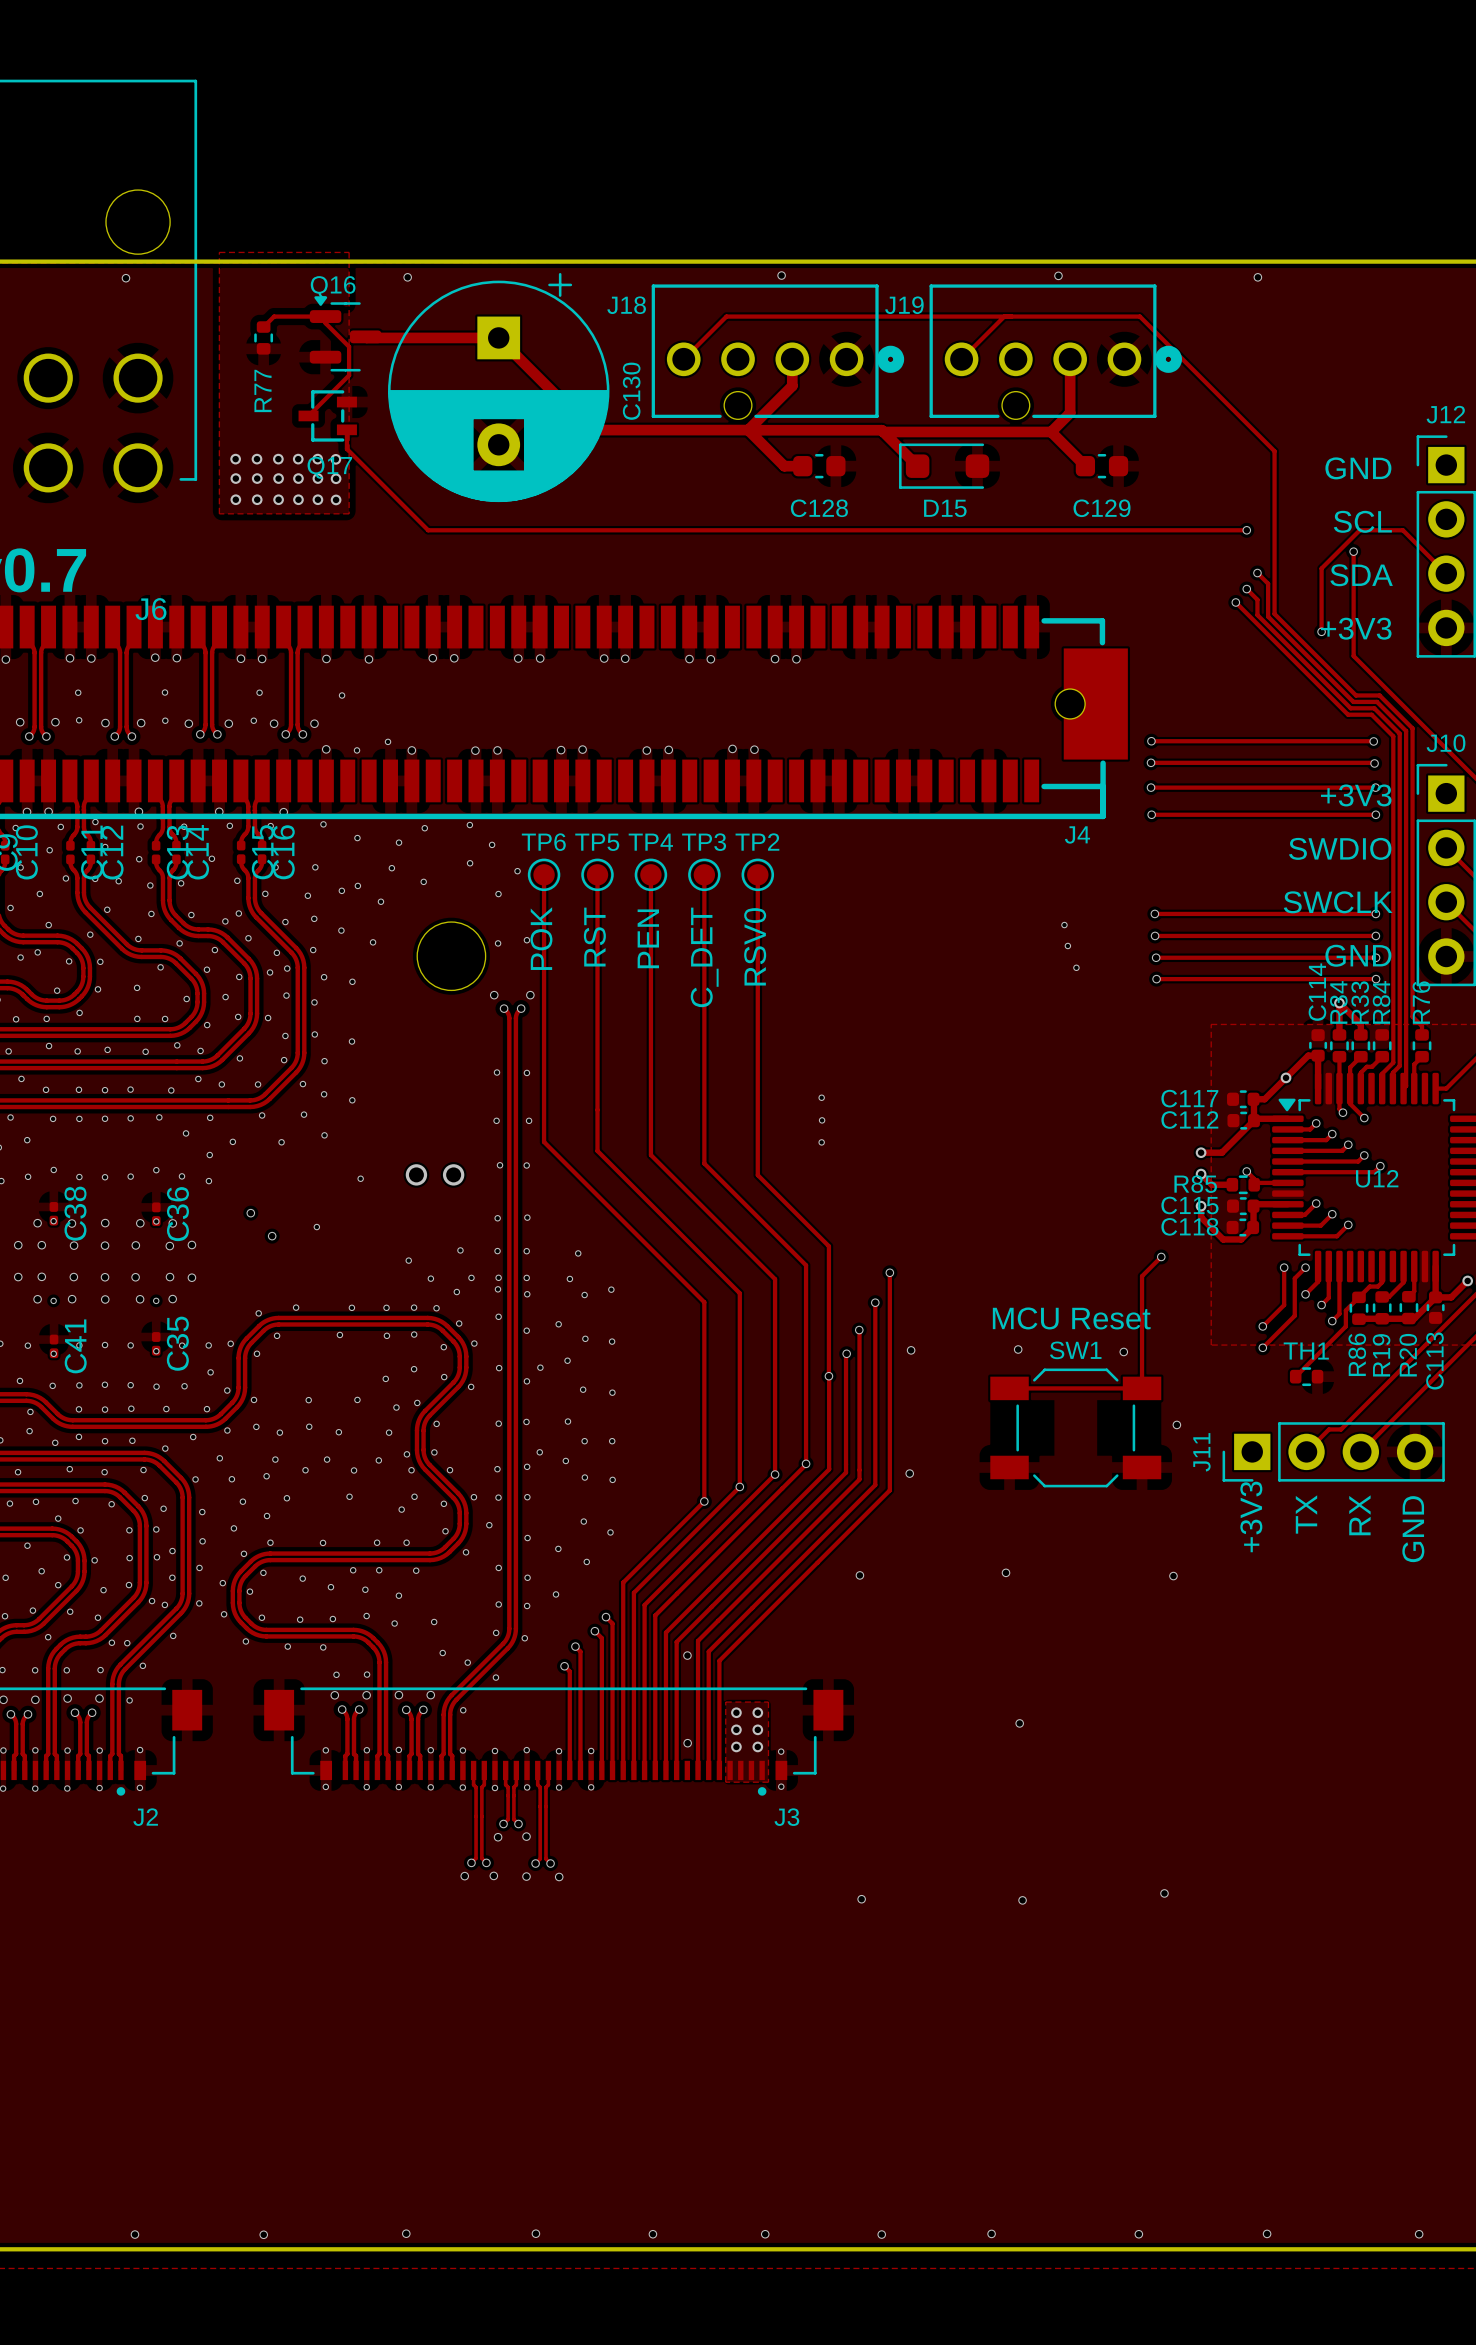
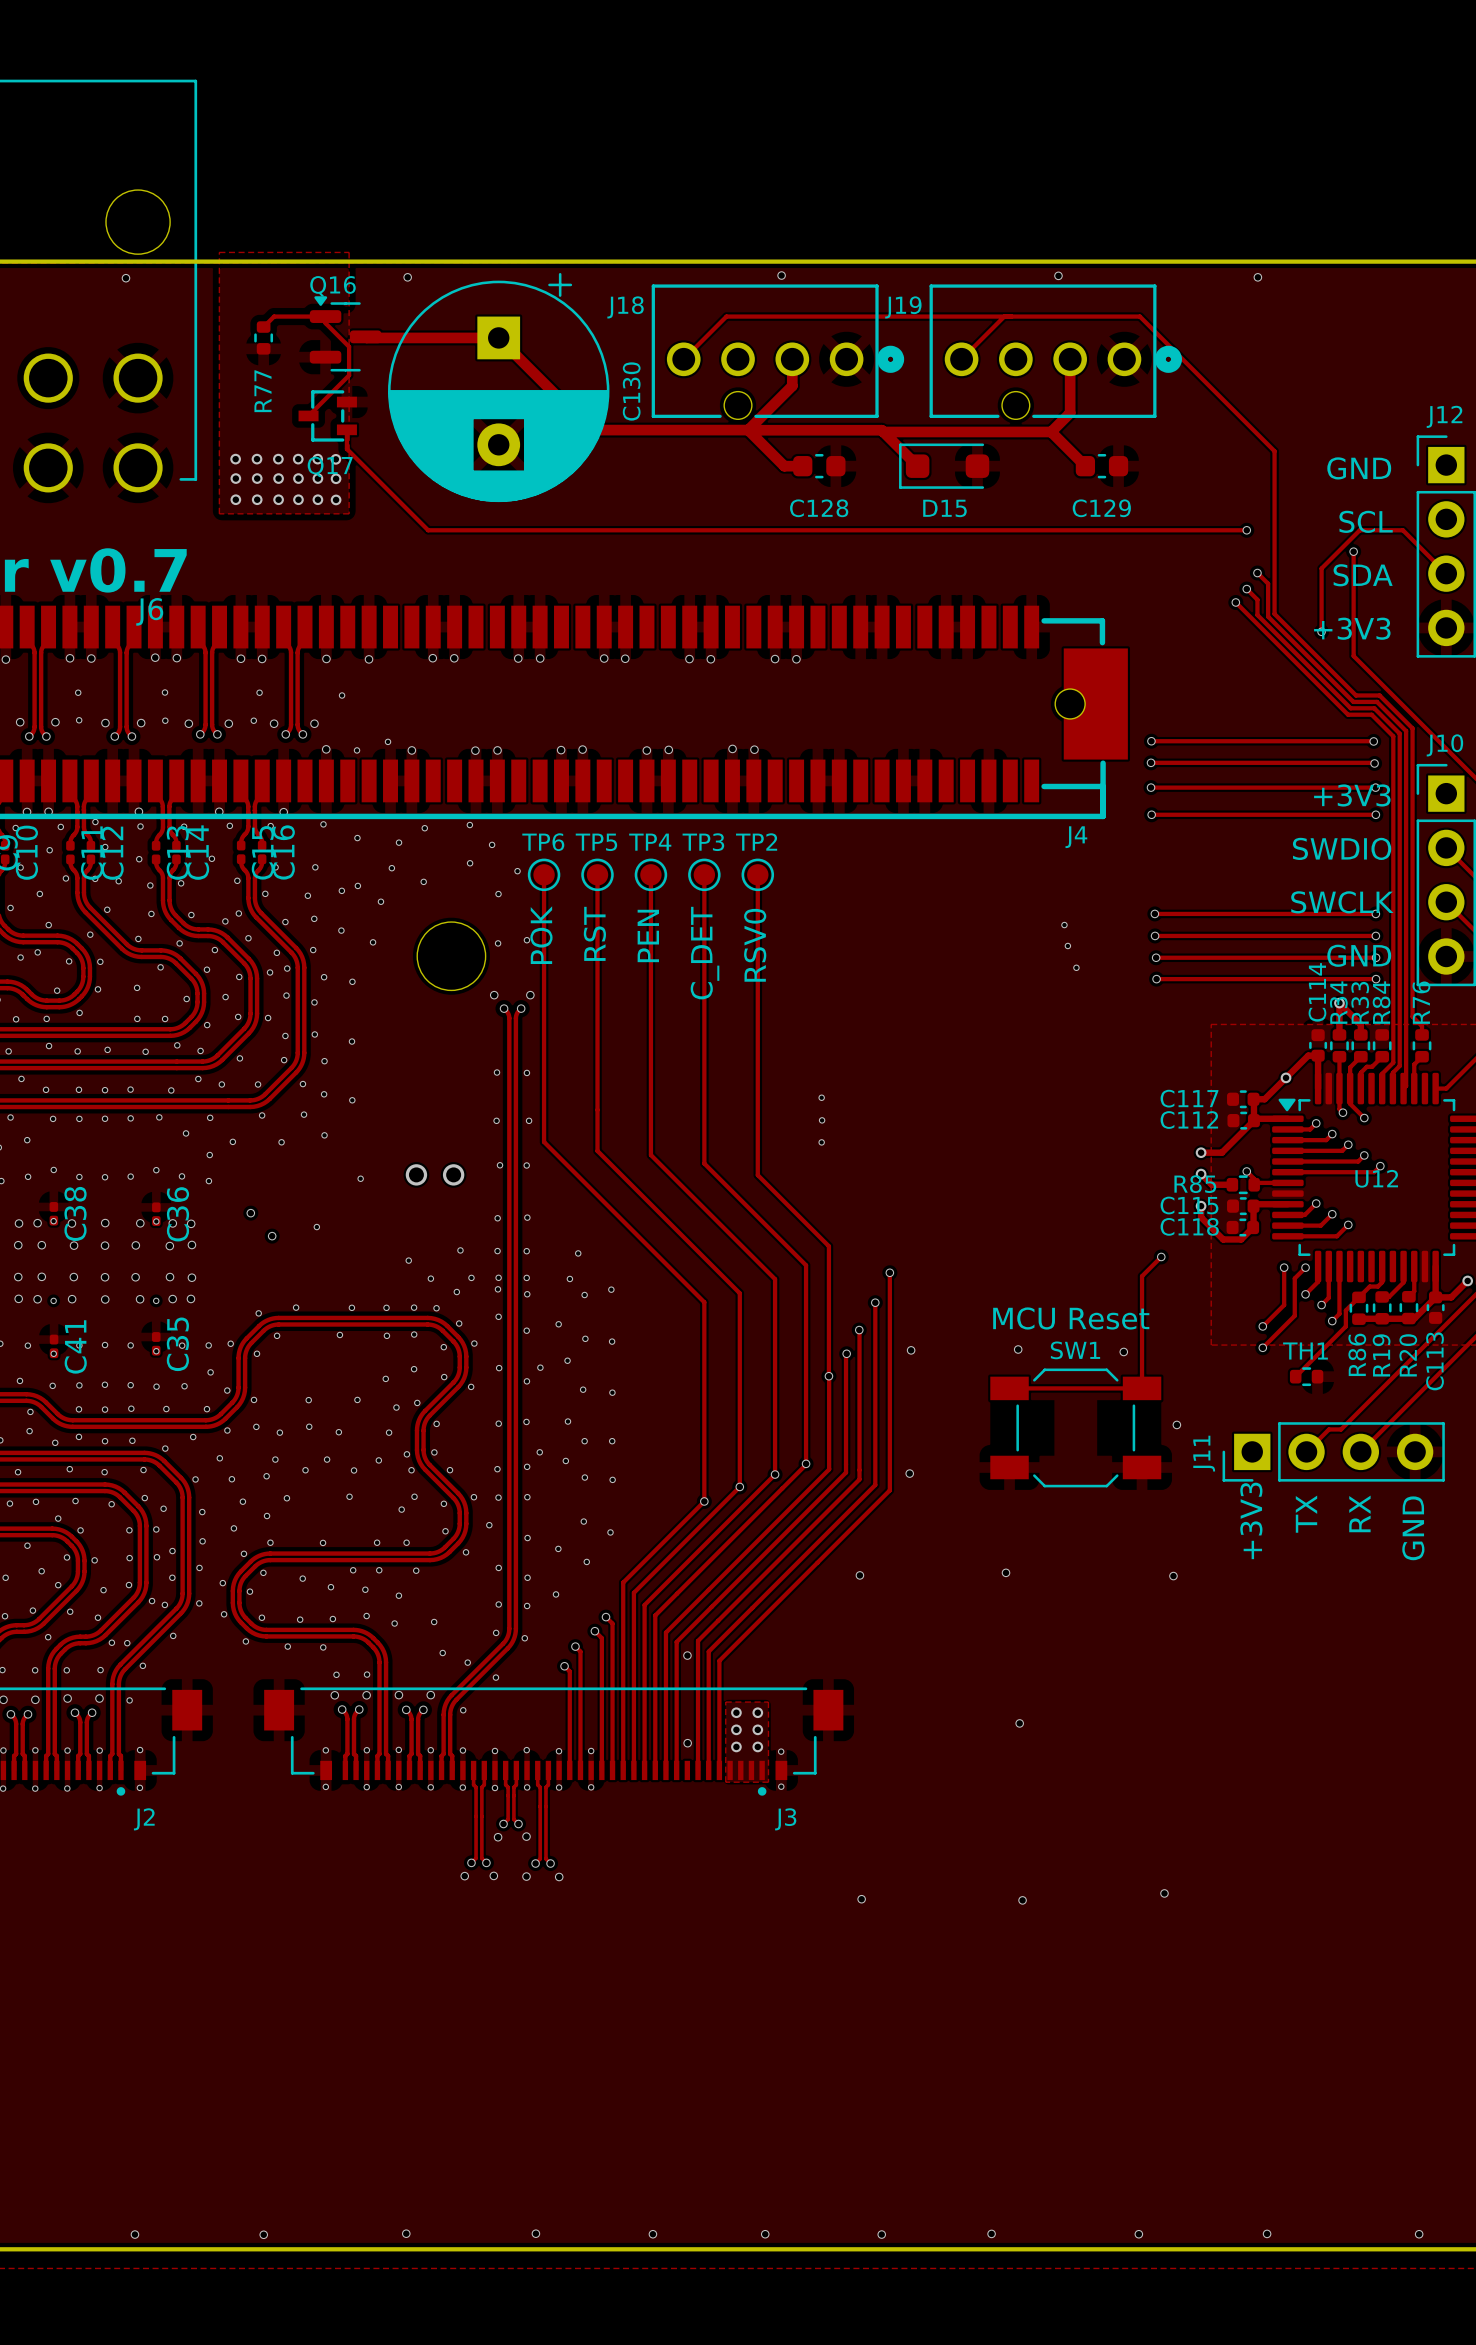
via: none -> (19, 1223)
via: none -> (191, 1223)
via: none -> (18, 1298)
via: none -> (190, 1298)

